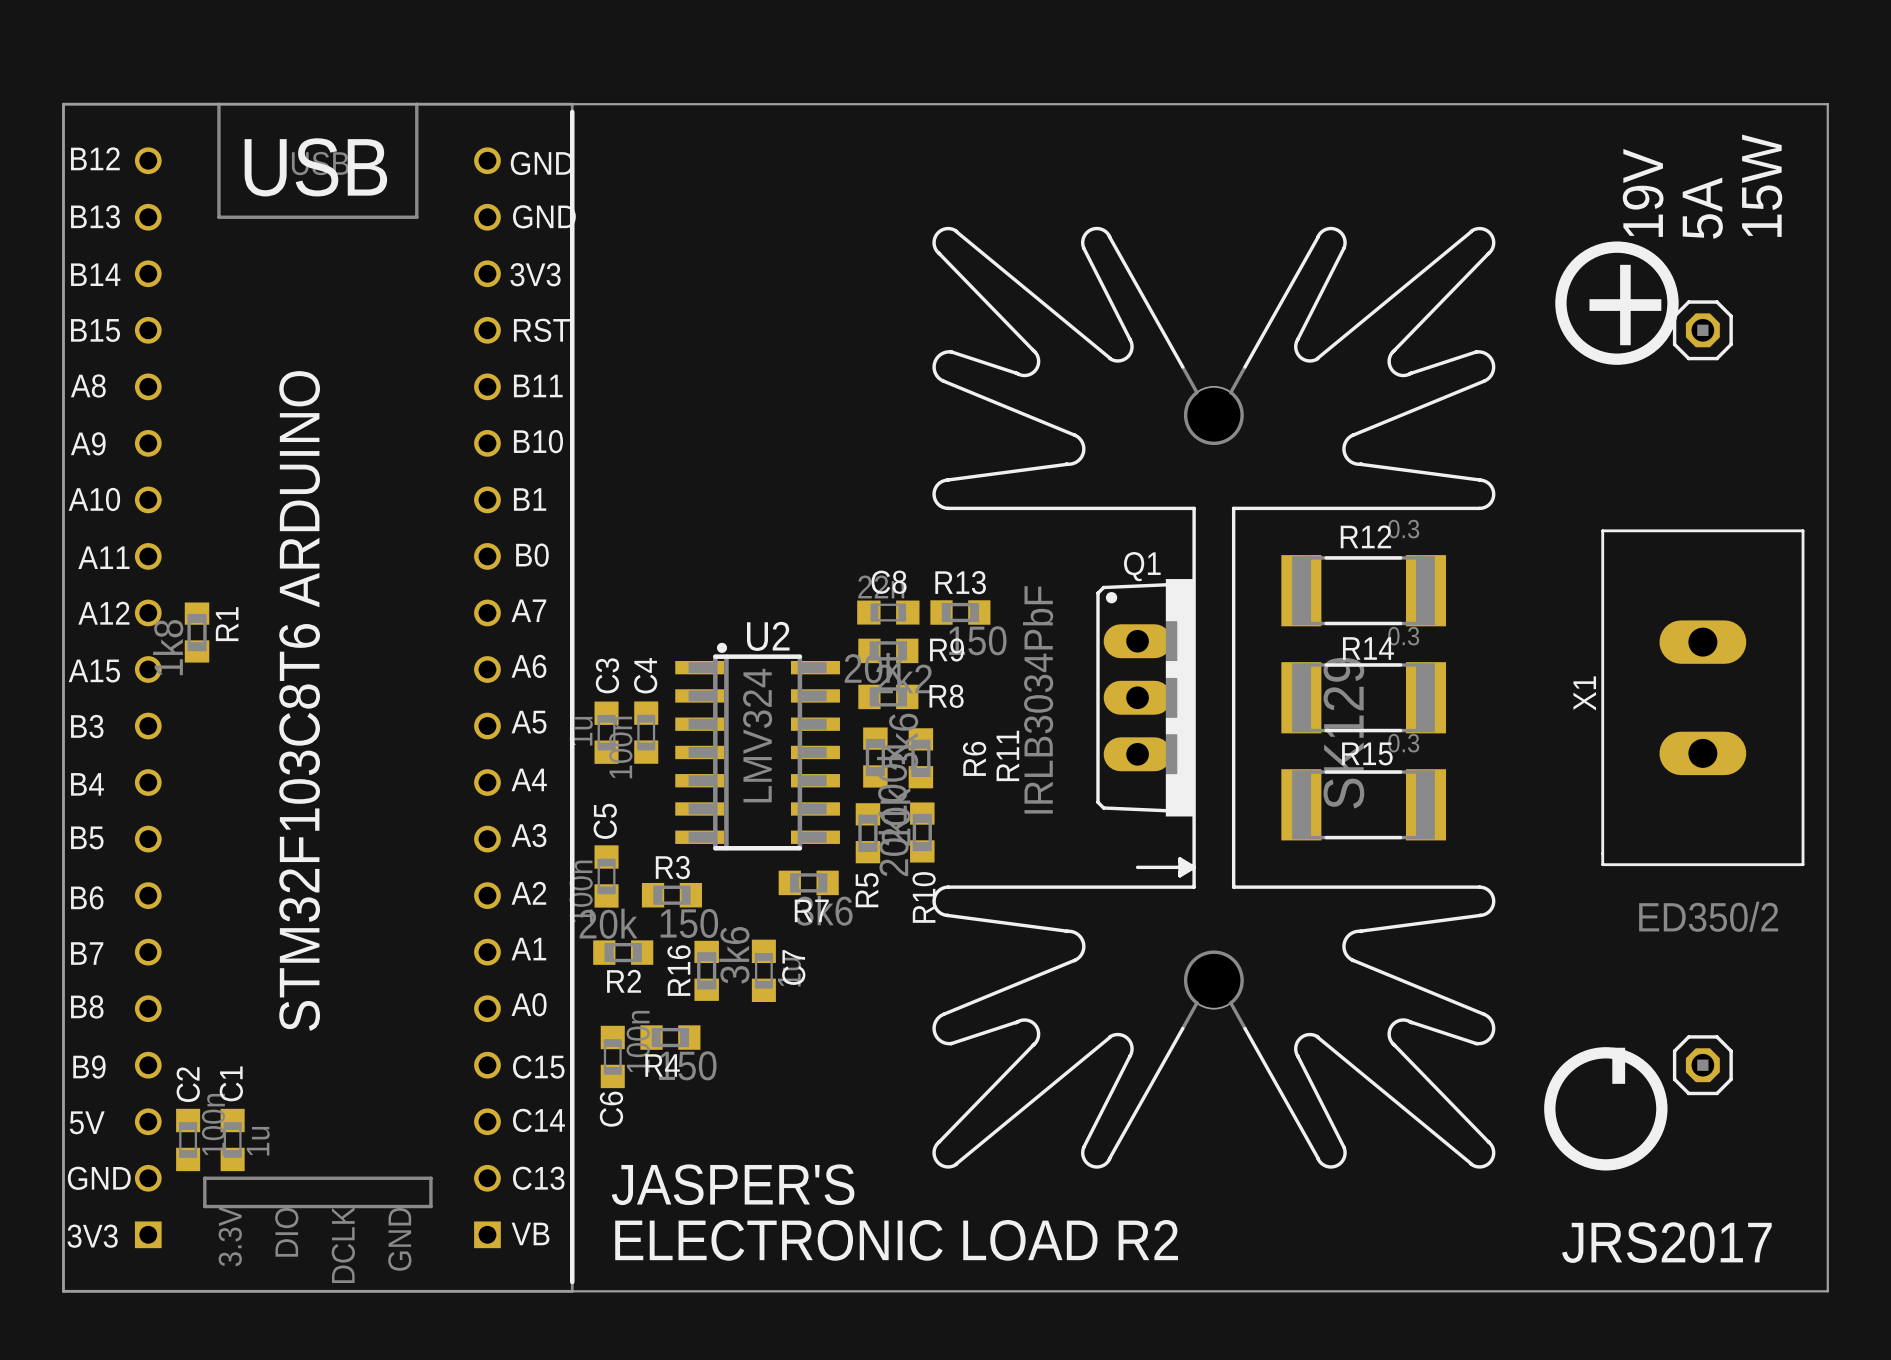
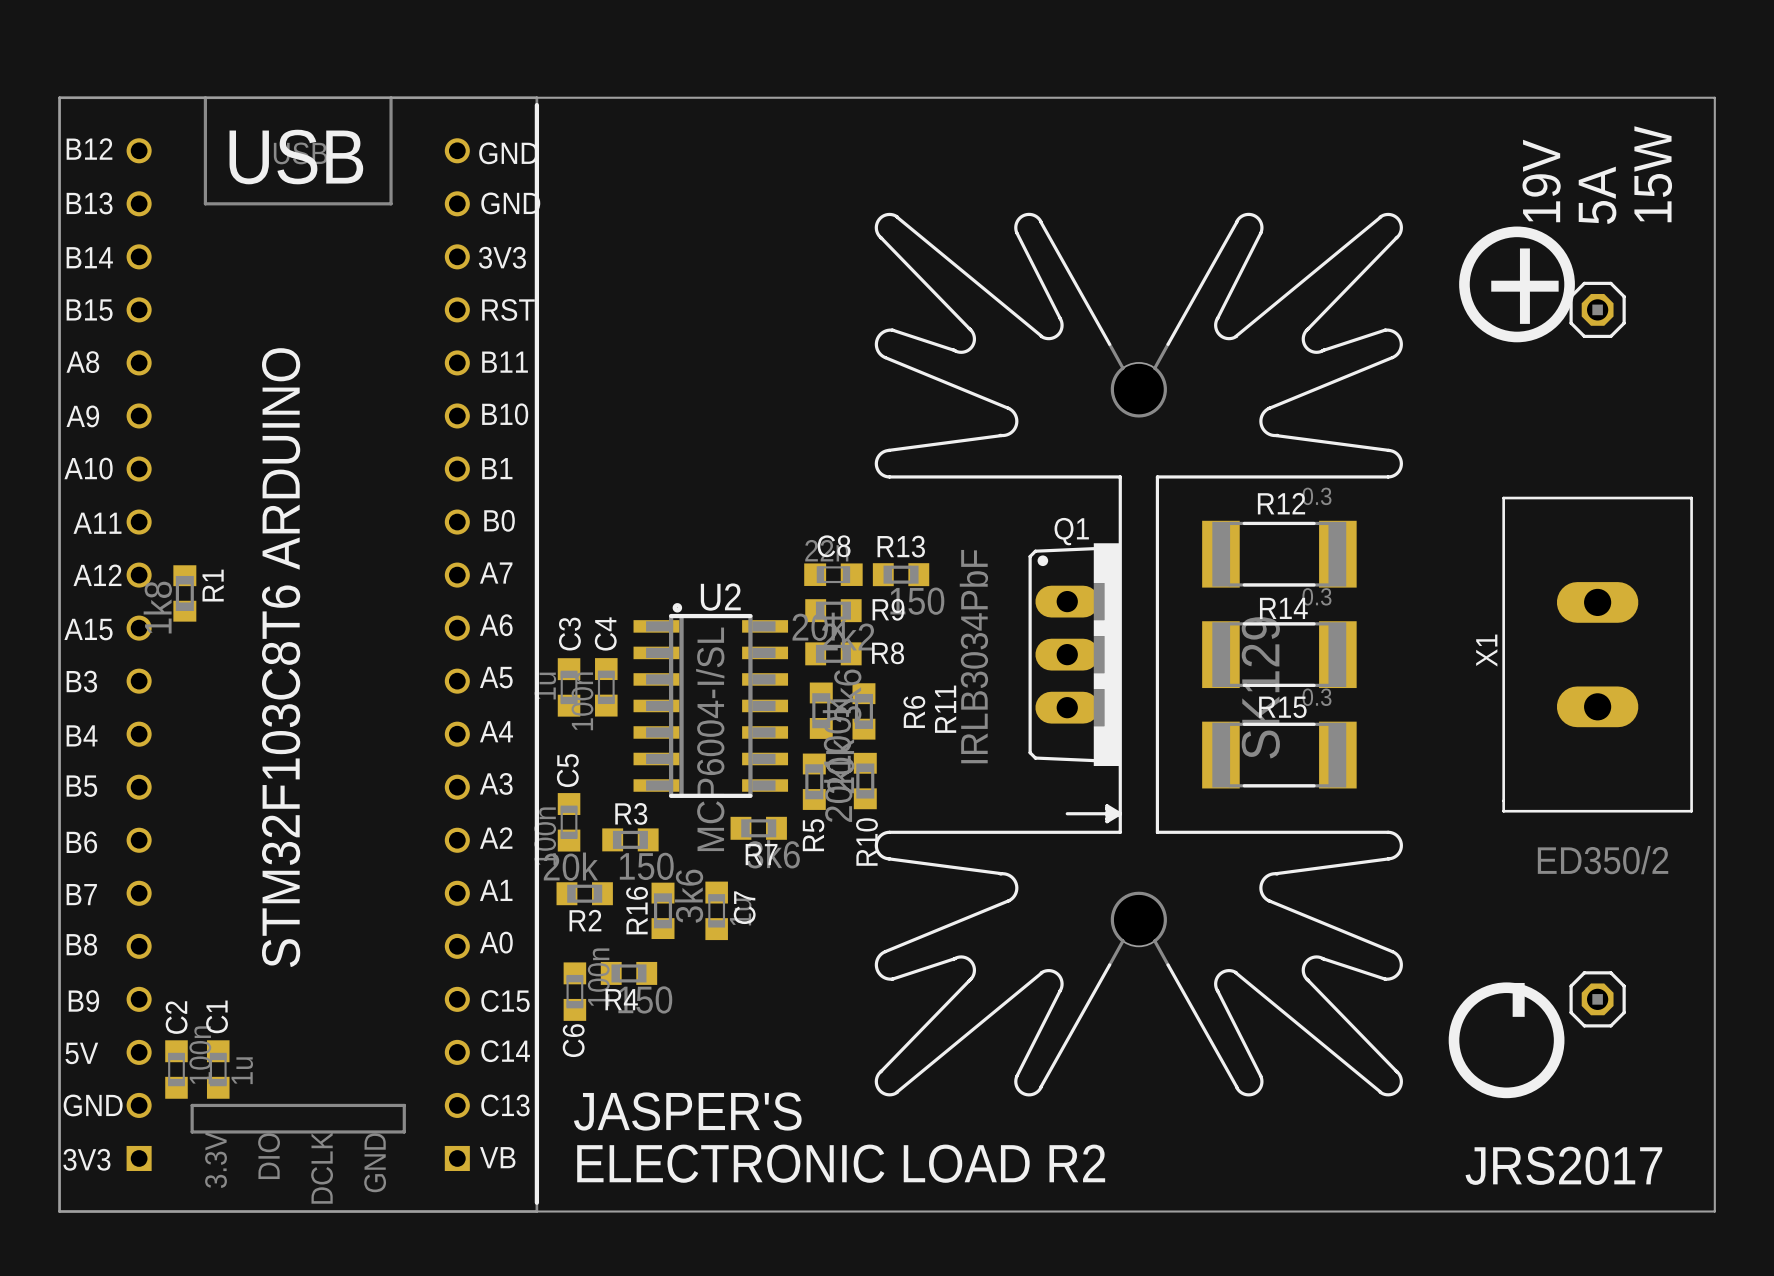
U2 value: LMV324 (757, 735) -> MCP6004-I/SL (710, 739)

